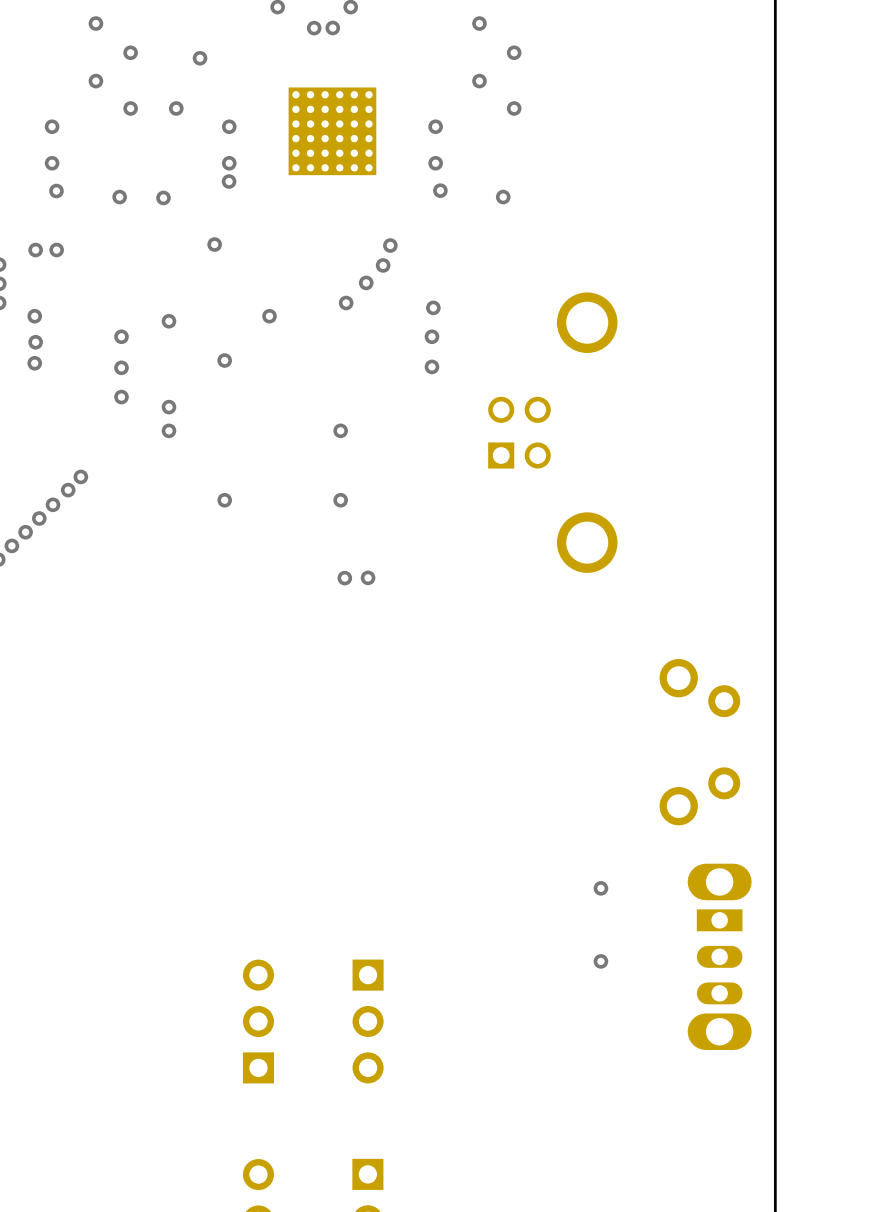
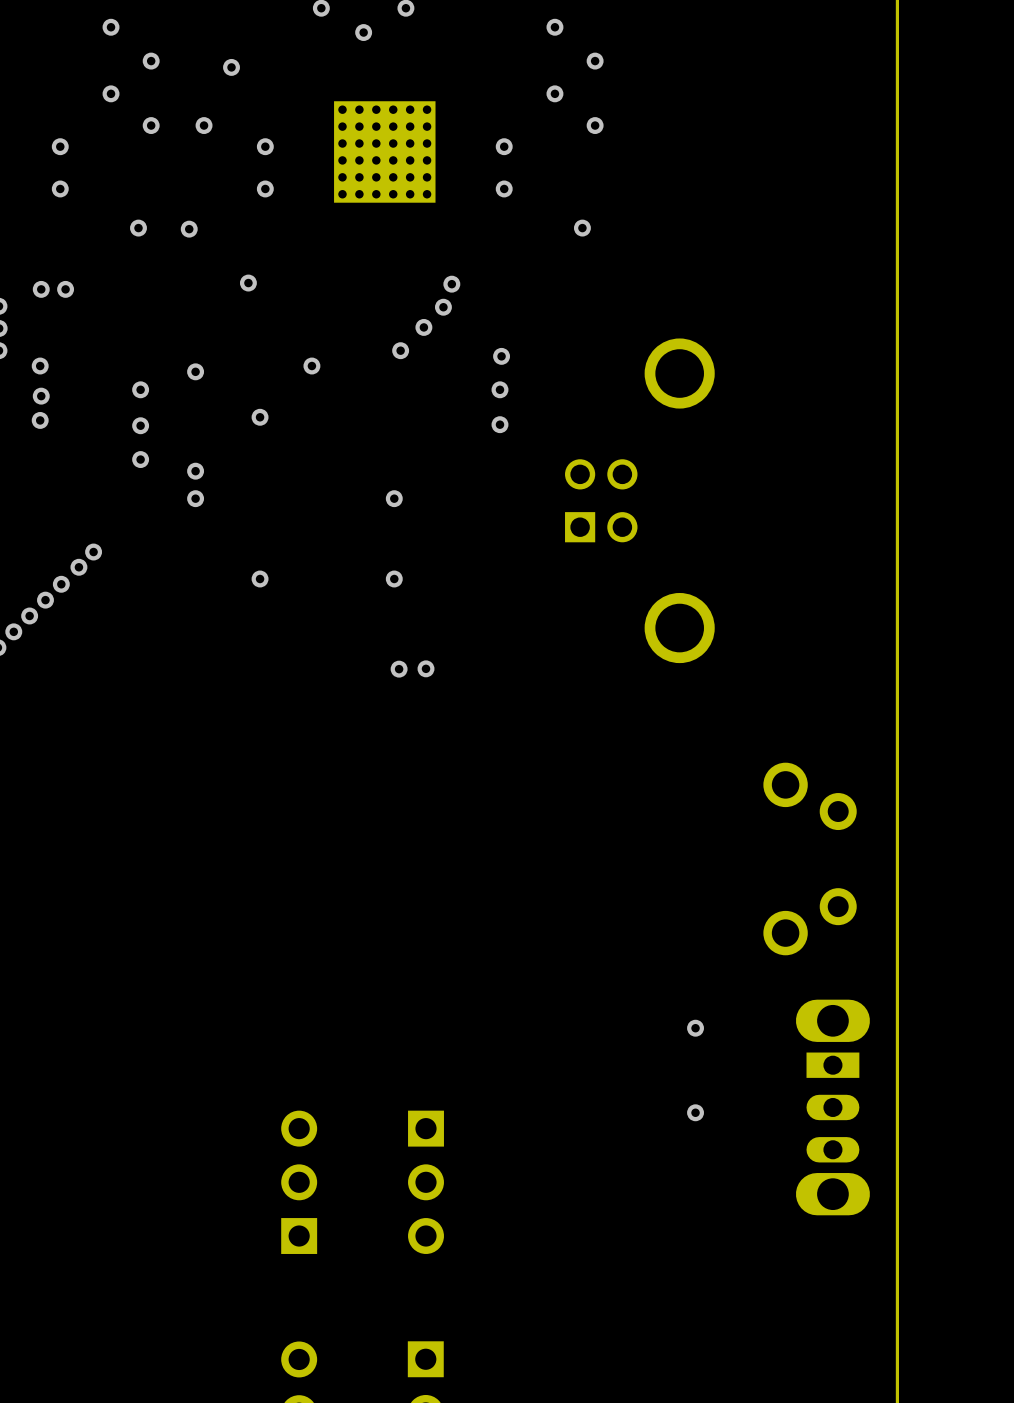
via: (332, 27) -> none
via: (229, 181) -> none
via: (440, 190) -> none
via: (56, 191) -> none

